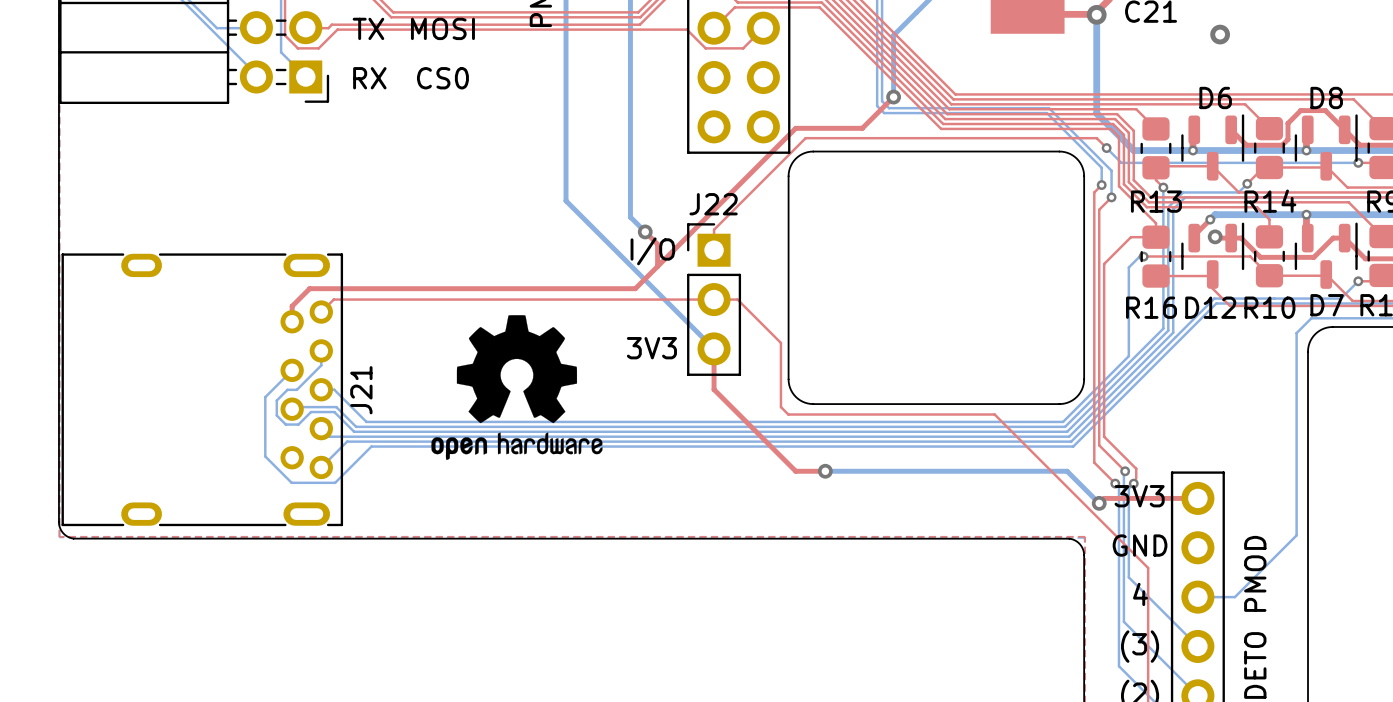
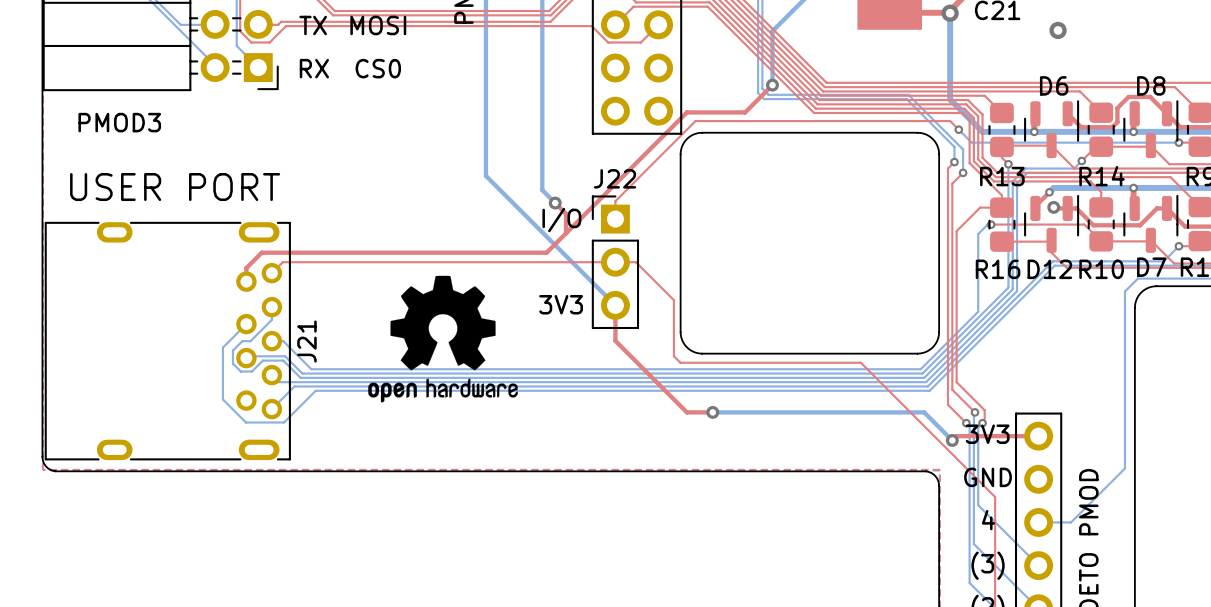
text: none -> PMOD3 (119, 122)
text: none -> USER PORT (175, 187)

